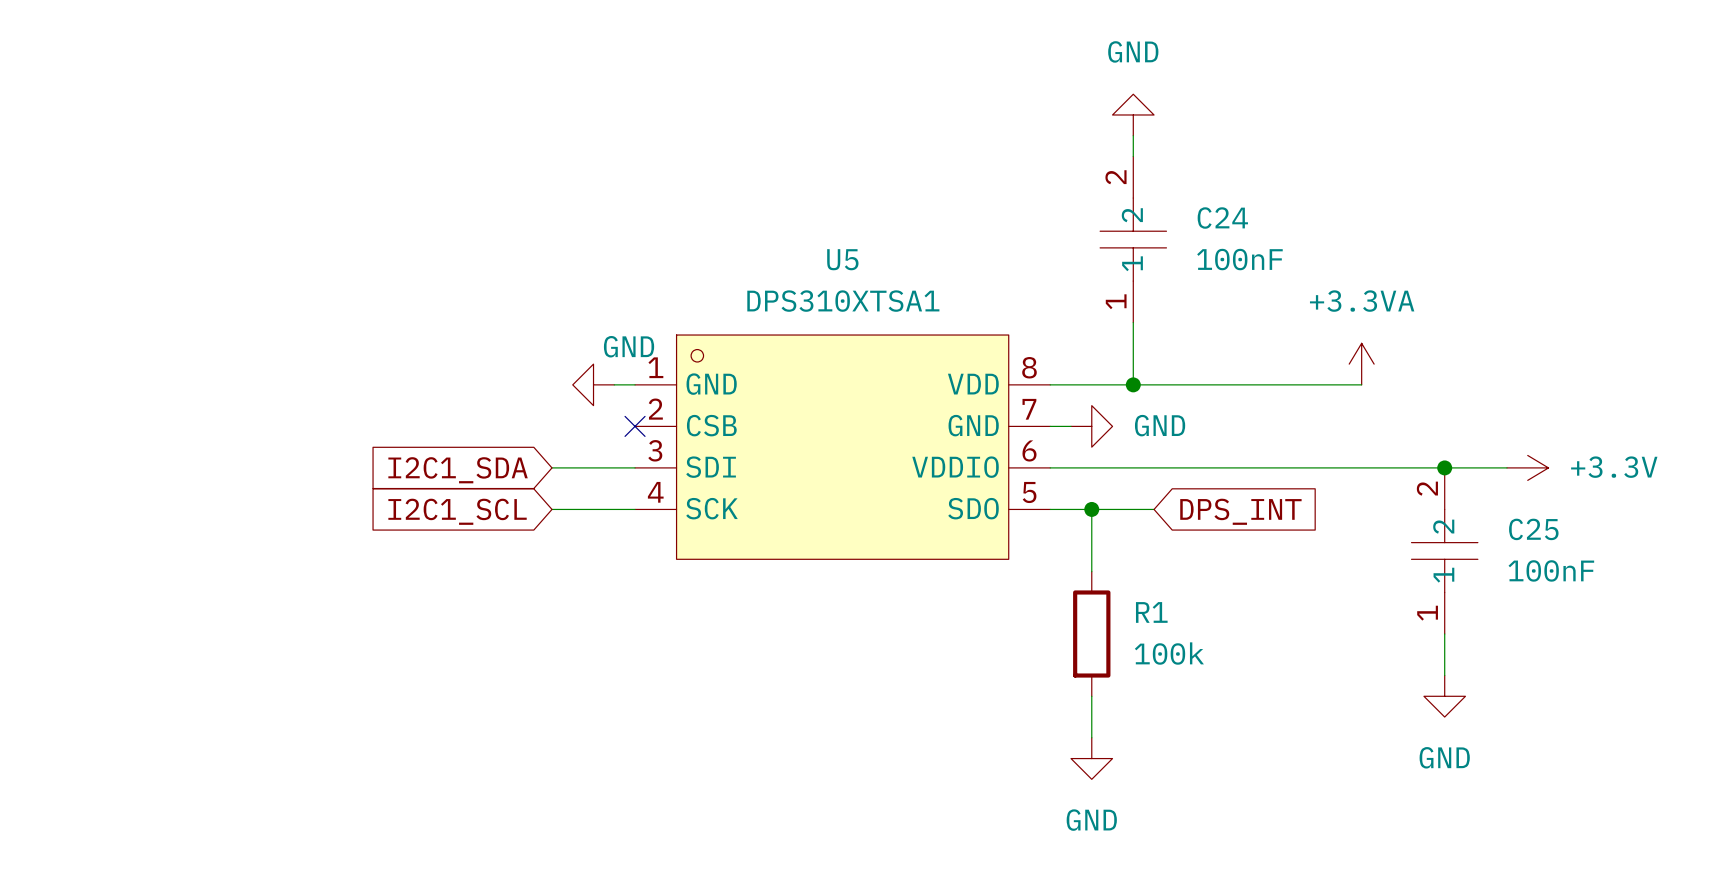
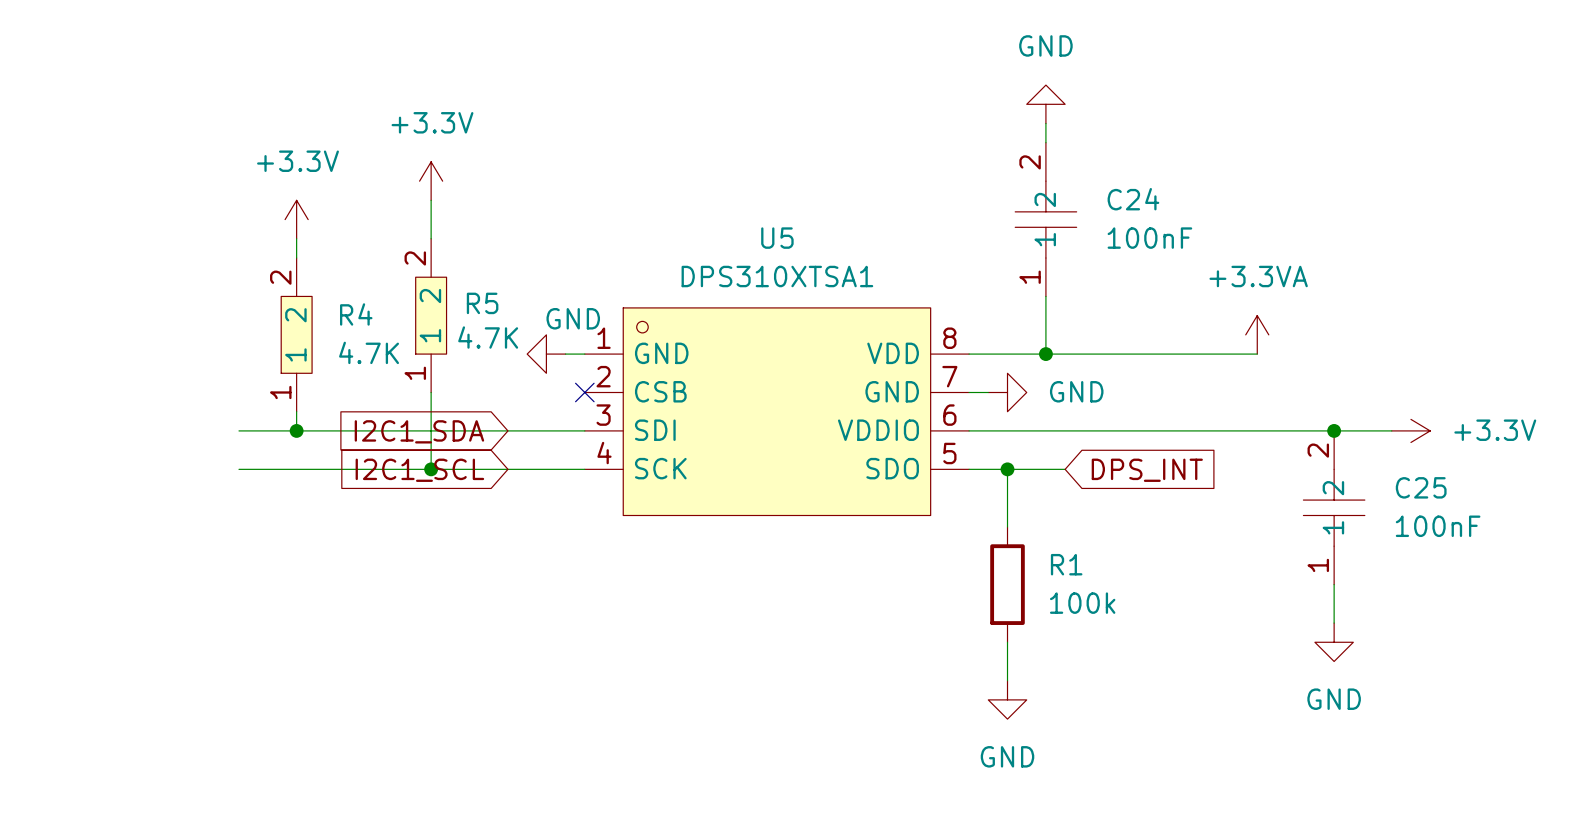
power symbol: none -> +3.3V (431, 181)
wire: none -> (431, 200) (431, 238)
power symbol: none -> +3.3V (296, 219)
wire: none -> (296, 238) (296, 258)
R5: none -> 4.7K (431, 315)
R4: none -> 4.7K (296, 334)
wire: none -> (431, 392) (431, 469)
wire: none -> (296, 411) (296, 430)
wire: none -> (238, 430) (507, 430)
junction: none -> (296, 430)
wire: none -> (238, 469) (507, 469)
junction: none -> (431, 469)

